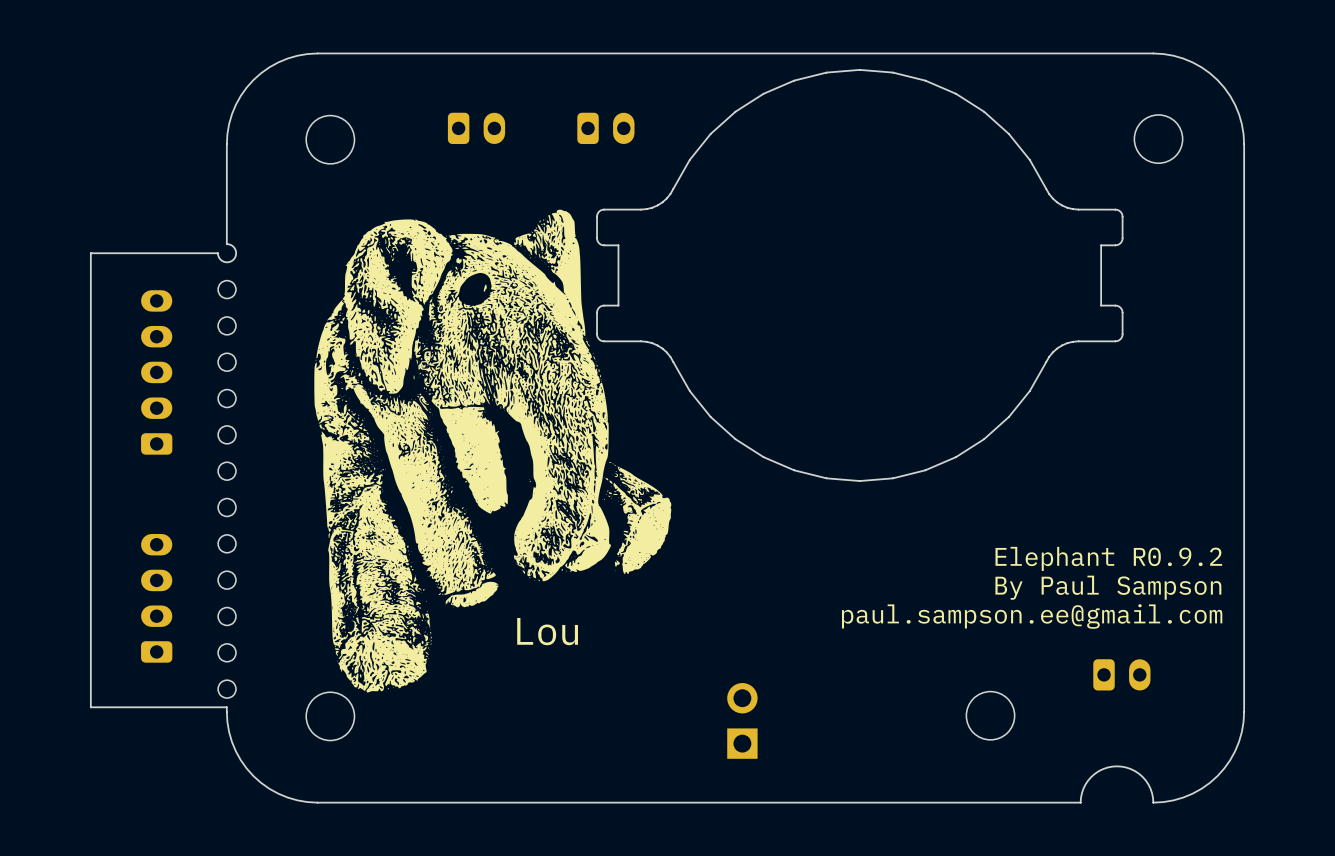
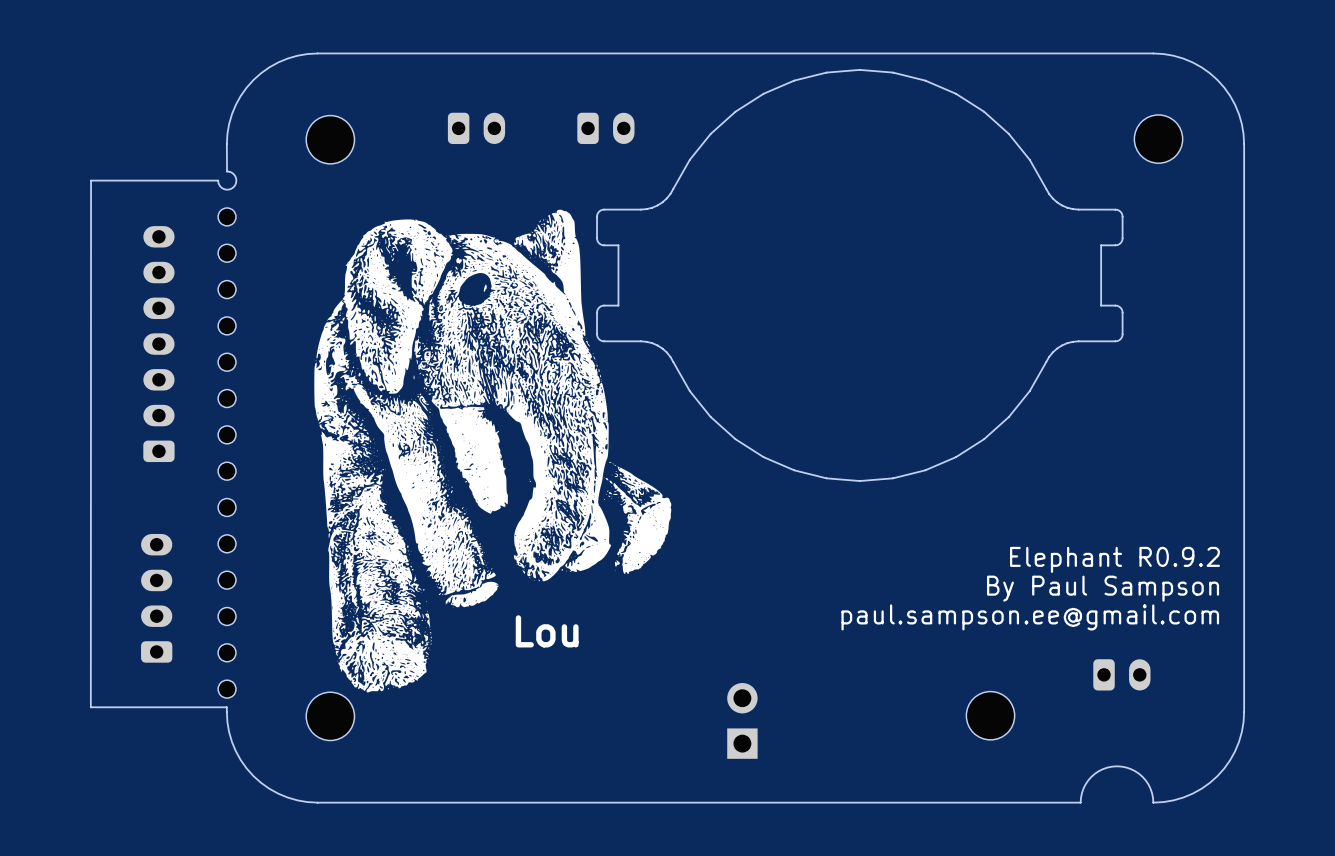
board edge: (226, 144) (226, 244) (232, 245) (235, 250) (235, 255) (232, 260) (223, 261) (217, 253) (90, 253) (90, 707) -> (226, 144) (227, 171) (233, 173) (236, 179) (235, 185) (229, 189) (221, 187) (218, 180) (91, 180) (90, 707)
part: none -> (227, 216)
part: none -> (227, 253)
part: none -> (158, 344)
part: (156, 372) -> none

